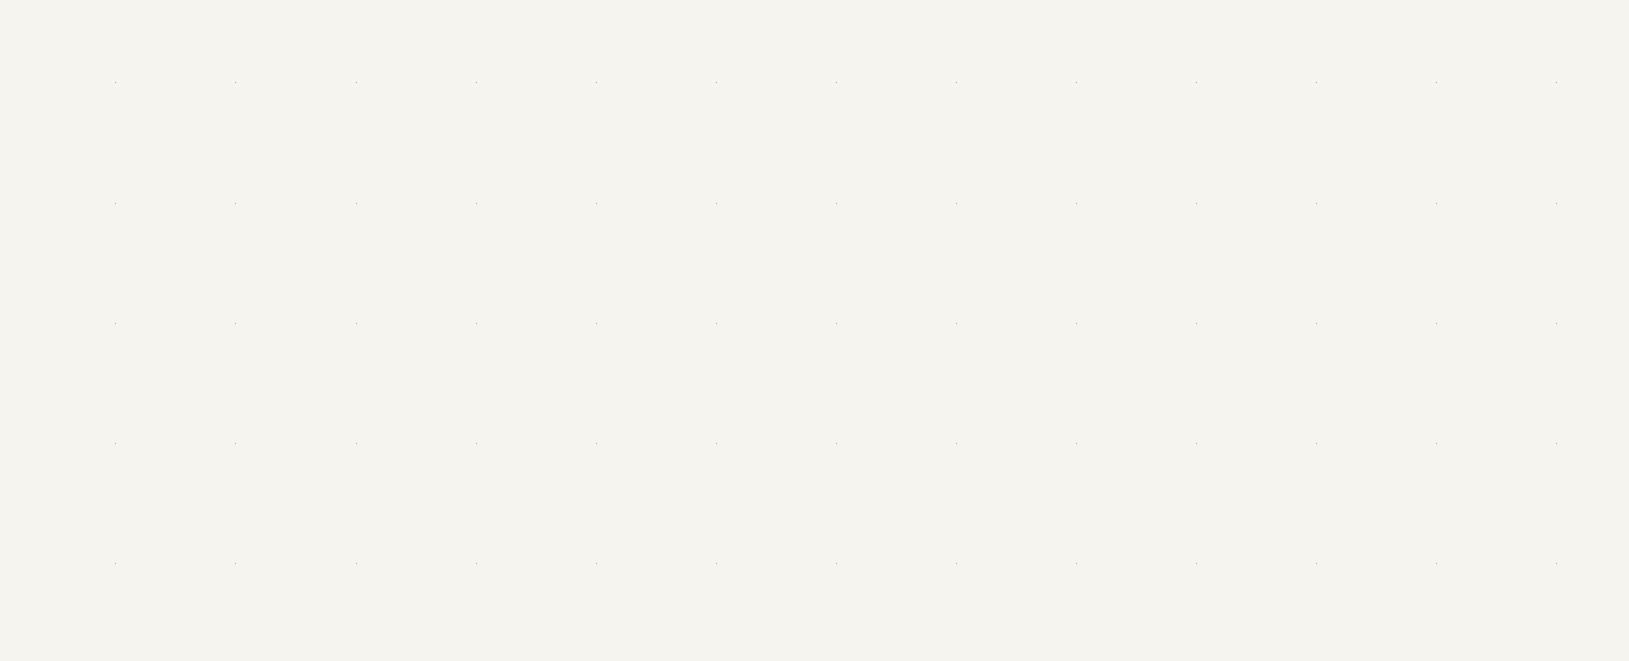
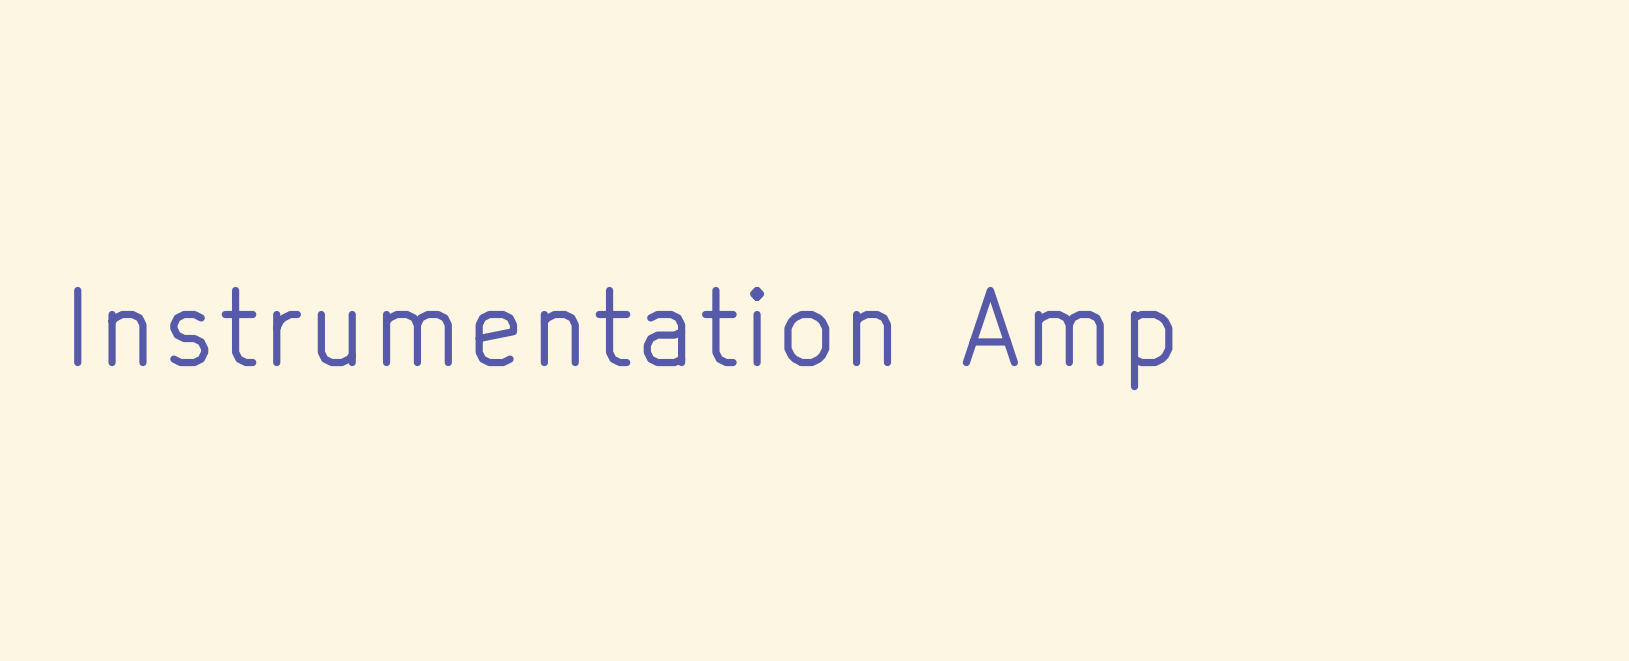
text: none -> Instrumentation Amp (623, 338)

